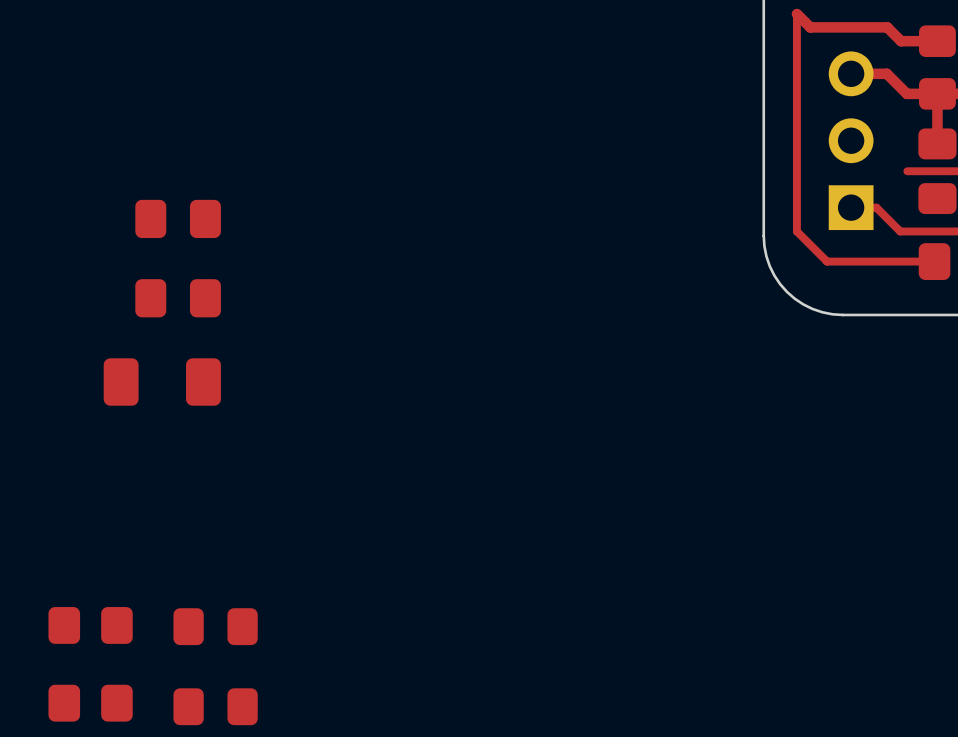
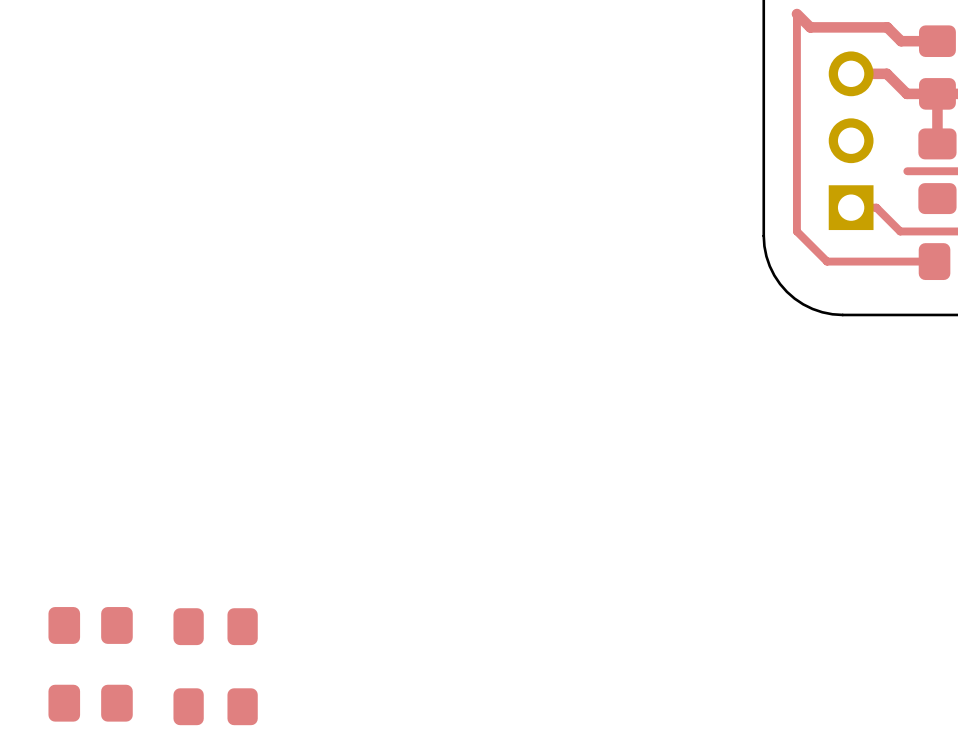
part: (178, 218) -> none
part: (178, 298) -> none
part: (162, 382) -> none

